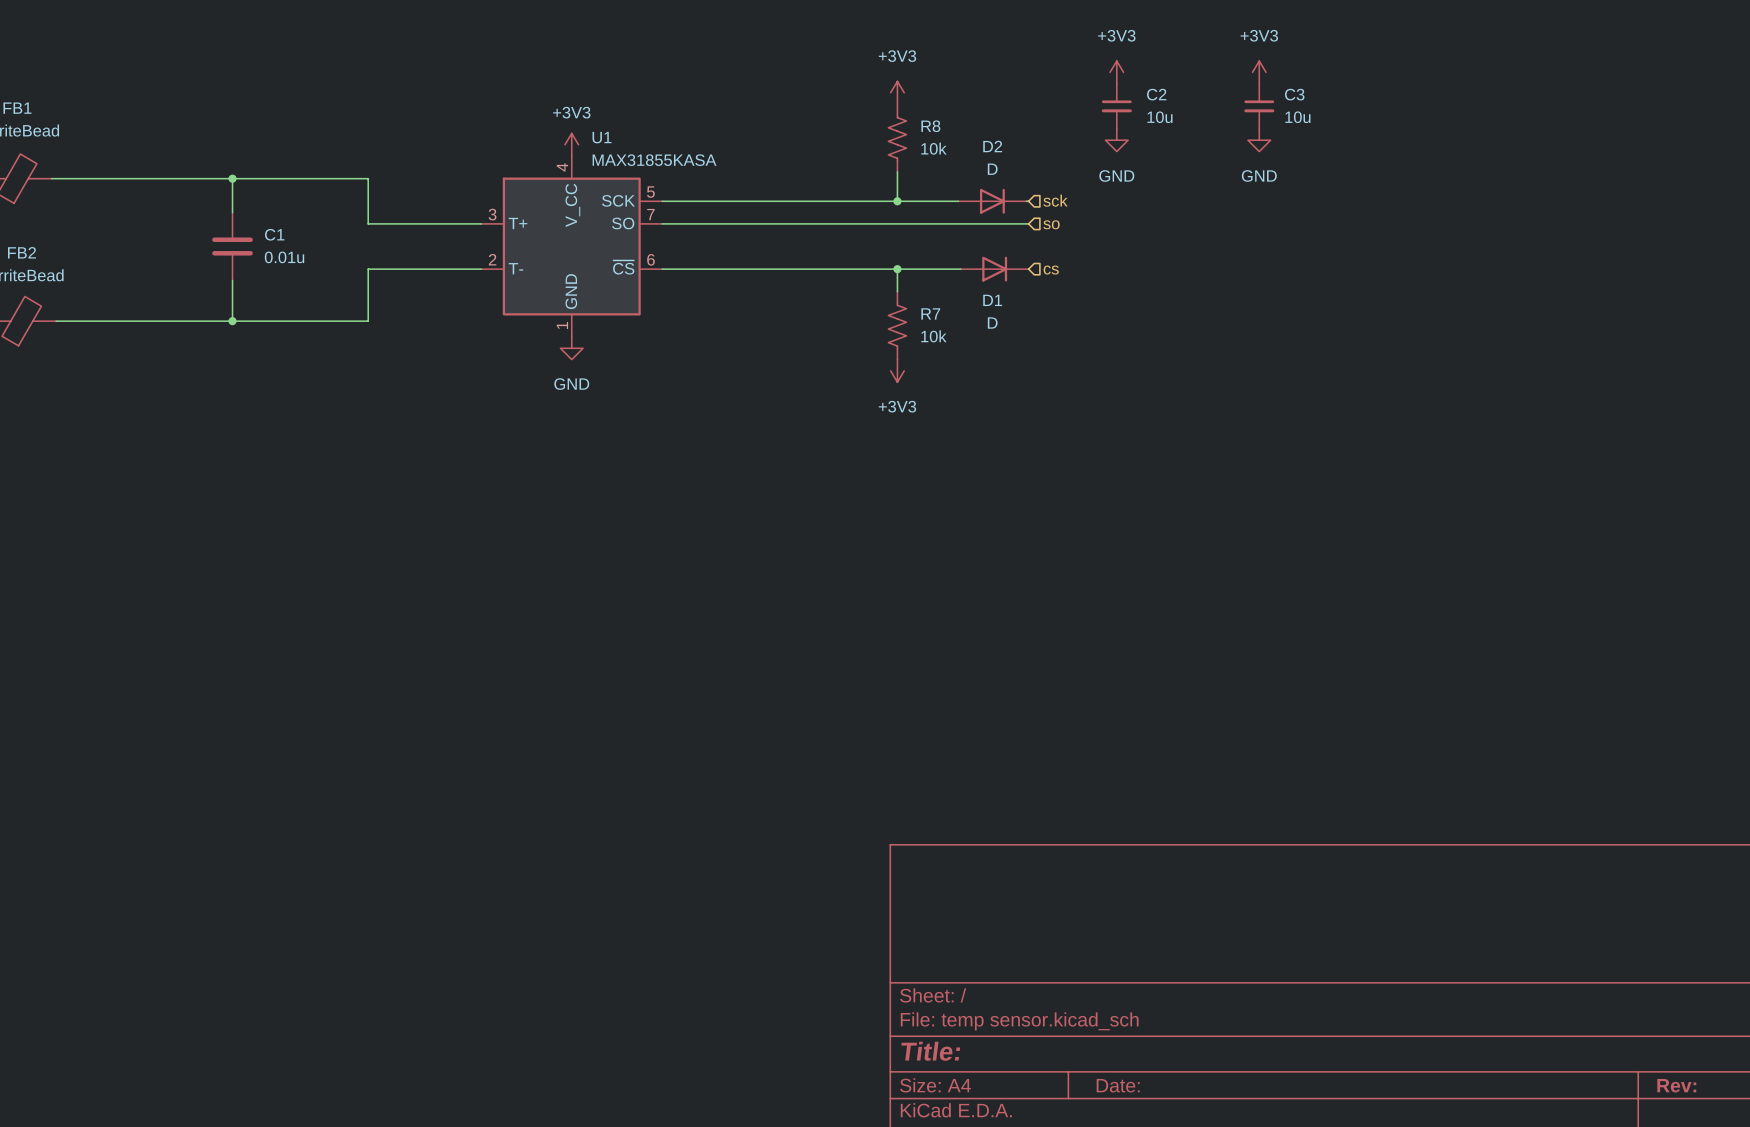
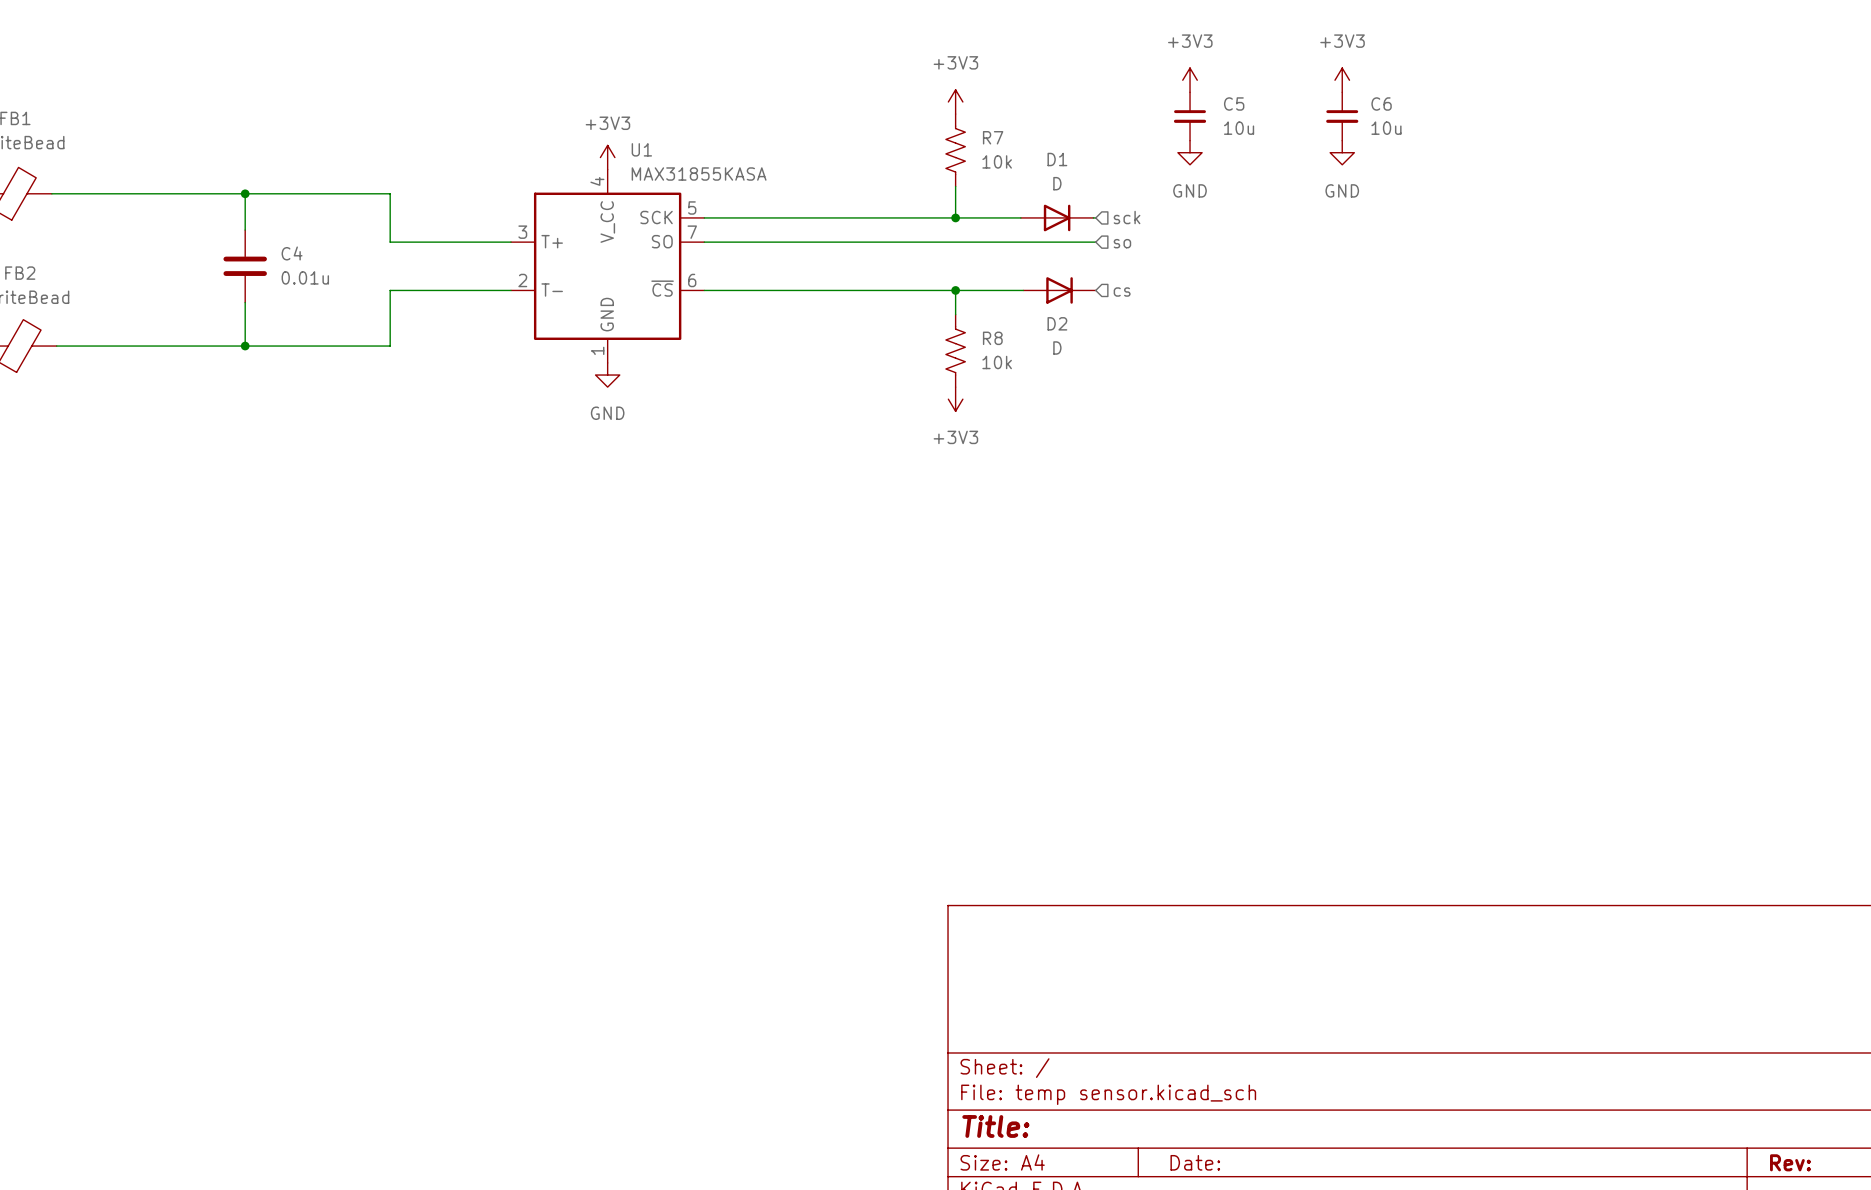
C2 name: C2 (1156, 94) -> C5 (1234, 103)
C3 name: C3 (1294, 94) -> C6 (1381, 103)
R8 name: R8 (930, 126) -> R7 (993, 137)
D2 name: D2 (992, 146) -> D1 (1057, 159)
C1 name: C1 (274, 234) -> C4 (292, 253)
D1 name: D1 (992, 300) -> D2 (1057, 323)
R7 name: R7 (930, 313) -> R8 (992, 338)

